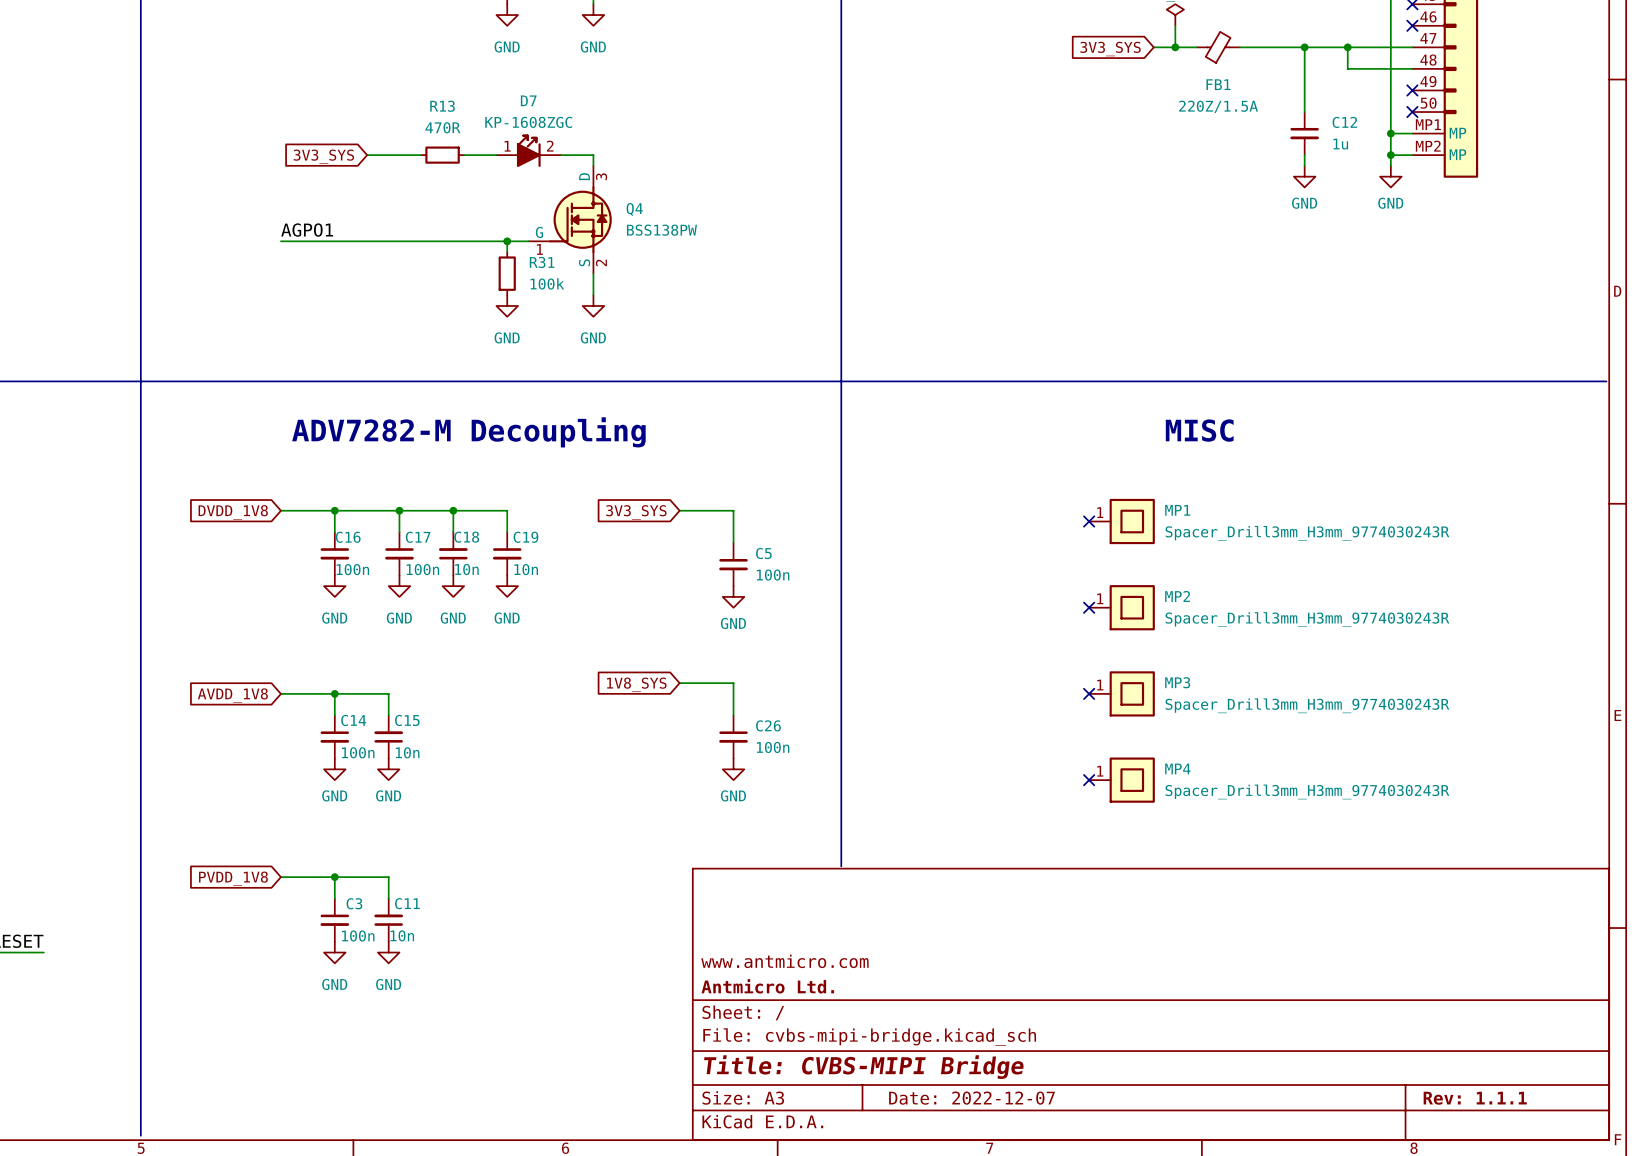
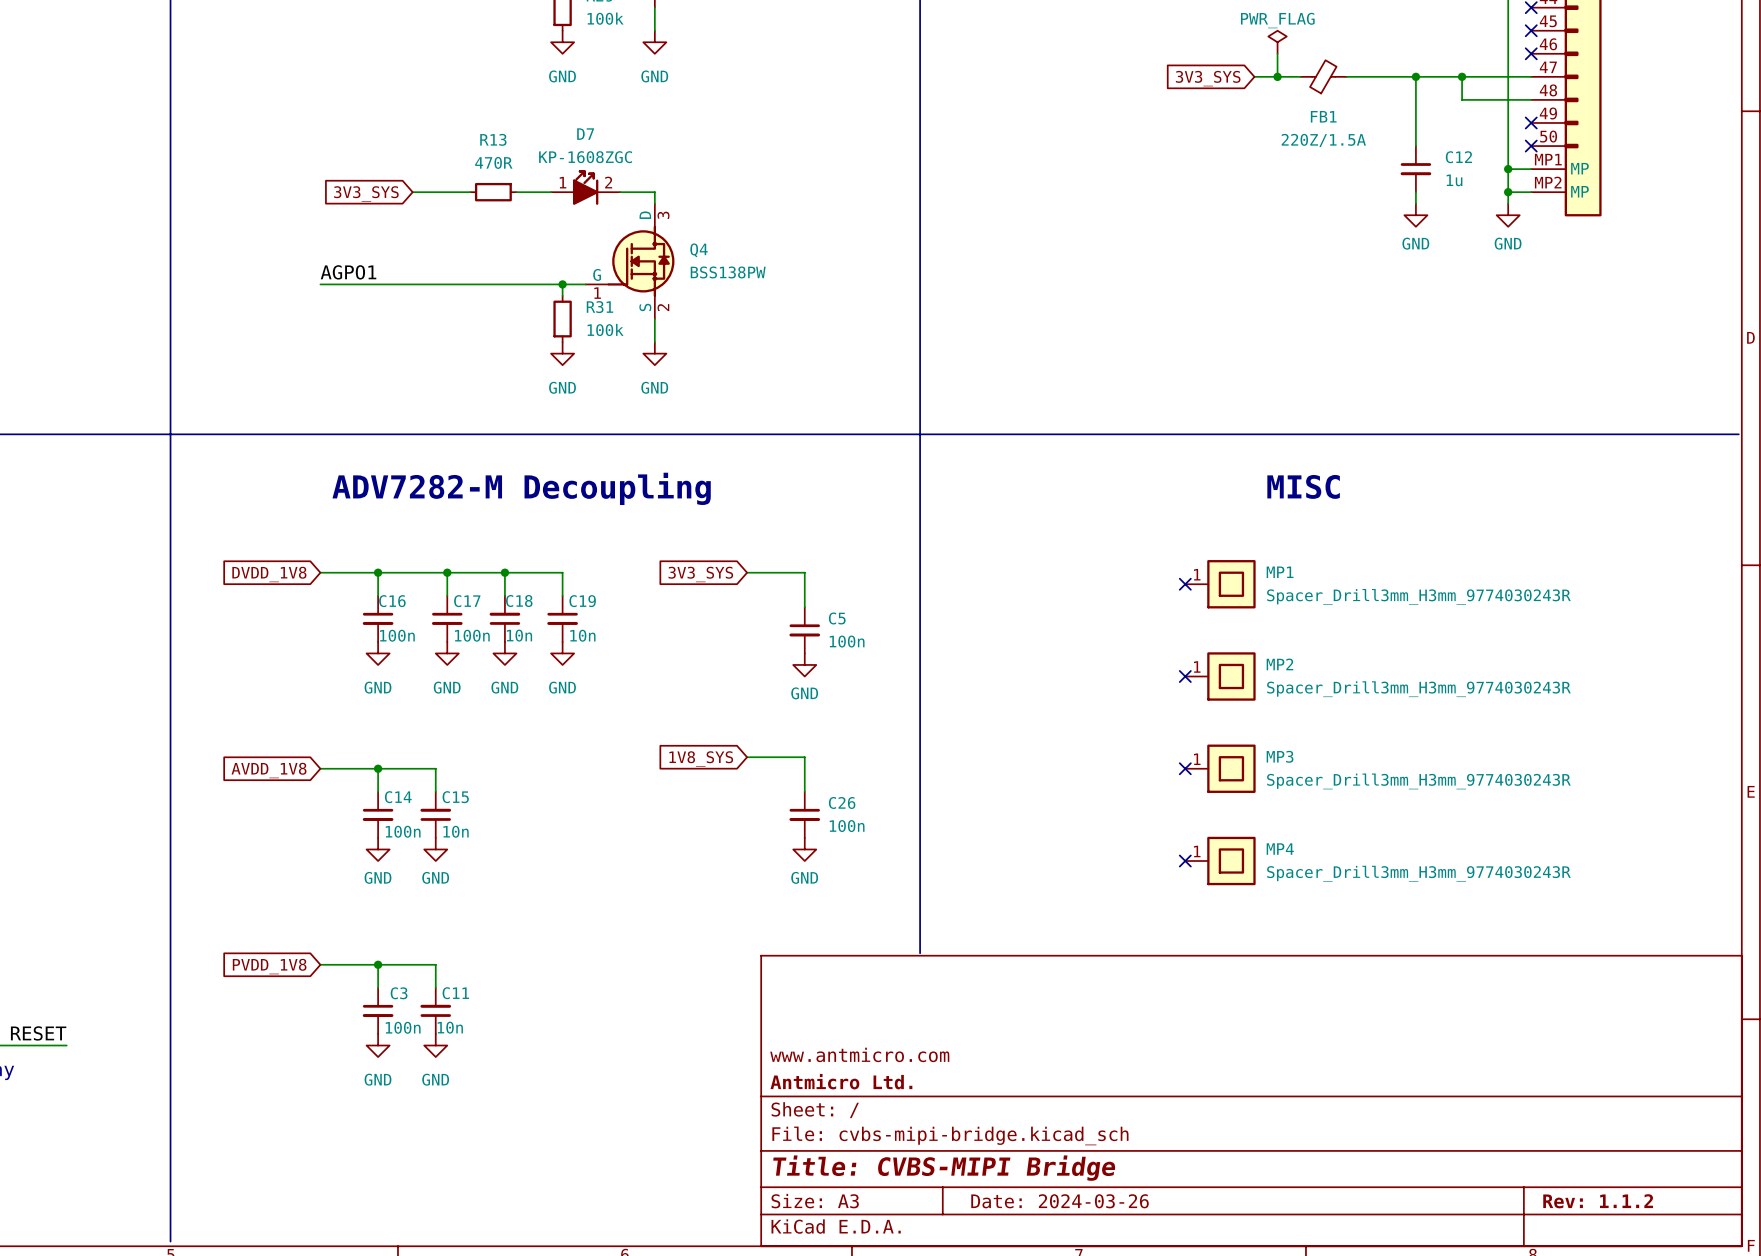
title block: Date: 2022-12-07 (971, 1098) -> Date: 2024-03-26 (1060, 1201)
title block: Rev: 1.1.1 (1475, 1098) -> Rev: 1.1.2 (1598, 1201)

